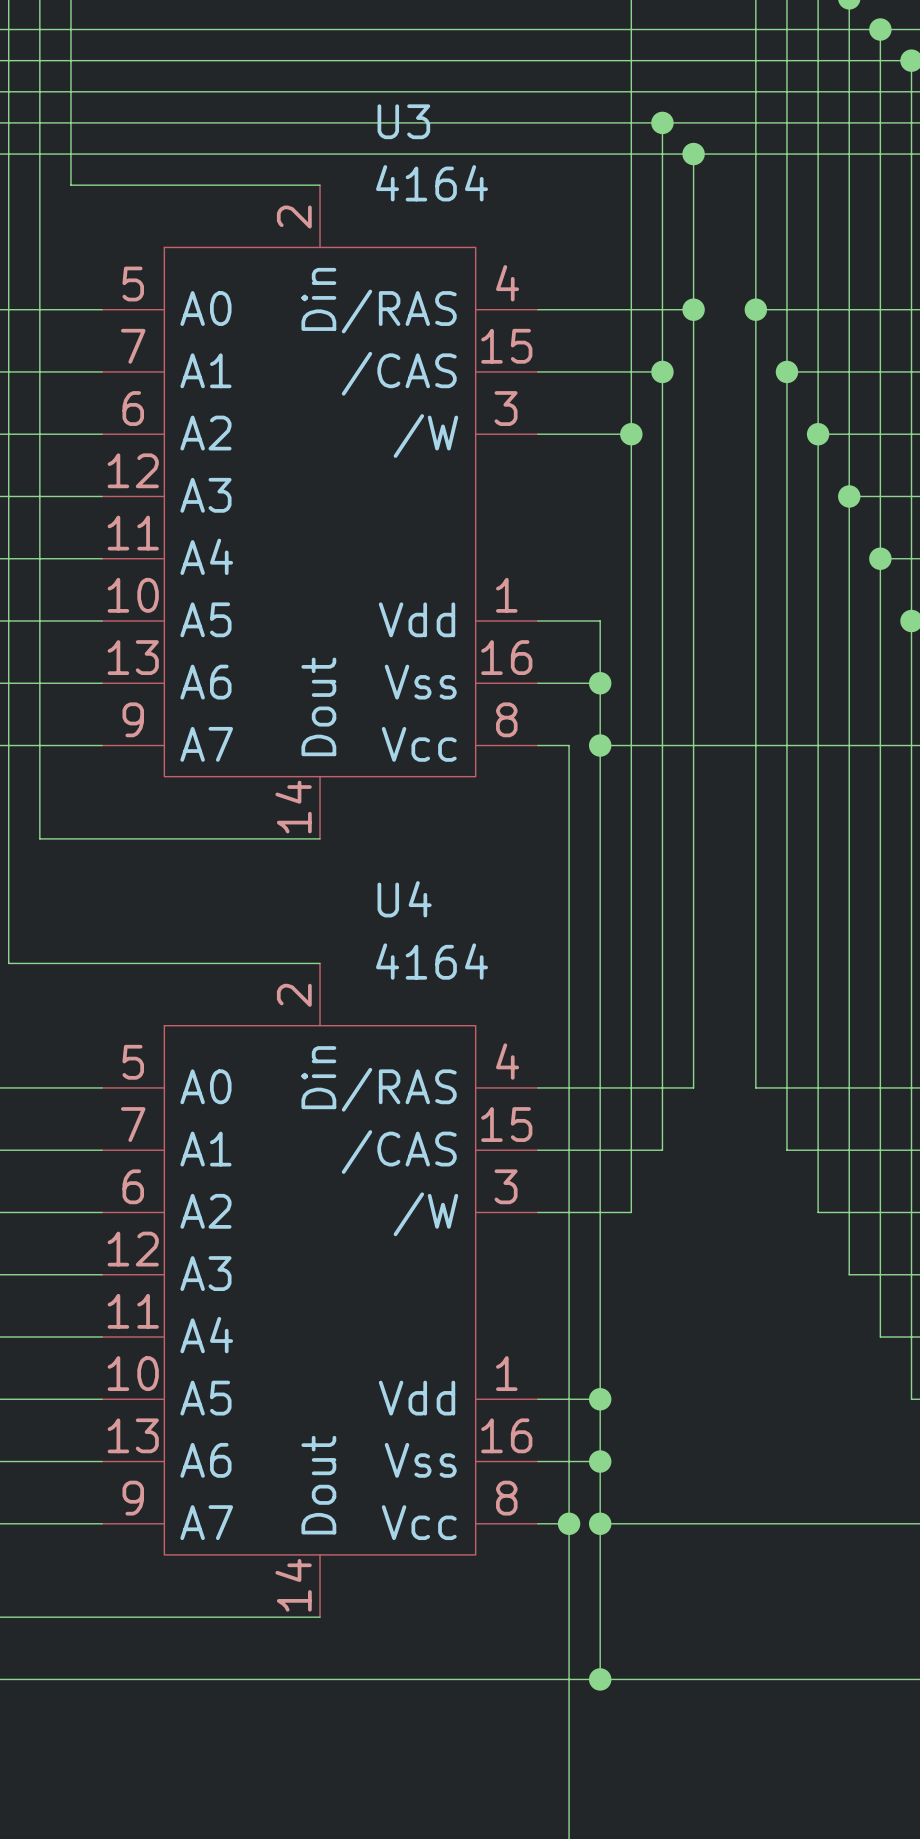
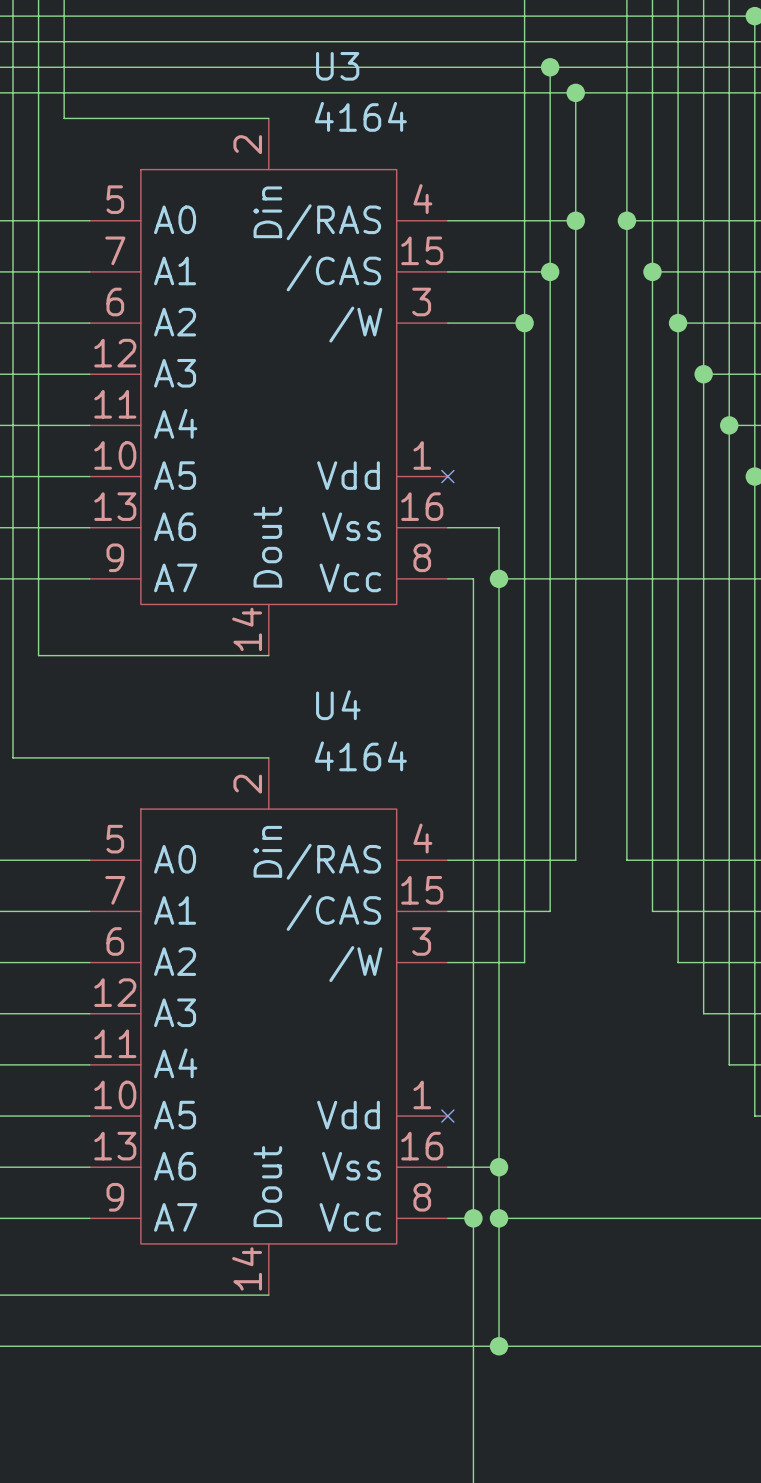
U3 symbol: [102, 185, 538, 839] -> [89, 118, 454, 656]
wire: (537, 621) (600, 621) (600, 683) -> none
junction: (600, 683) -> none
U4 symbol: [102, 963, 538, 1618] -> [89, 757, 454, 1296]
wire: (537, 1399) (600, 1399) -> none
junction: (600, 1399) -> none

